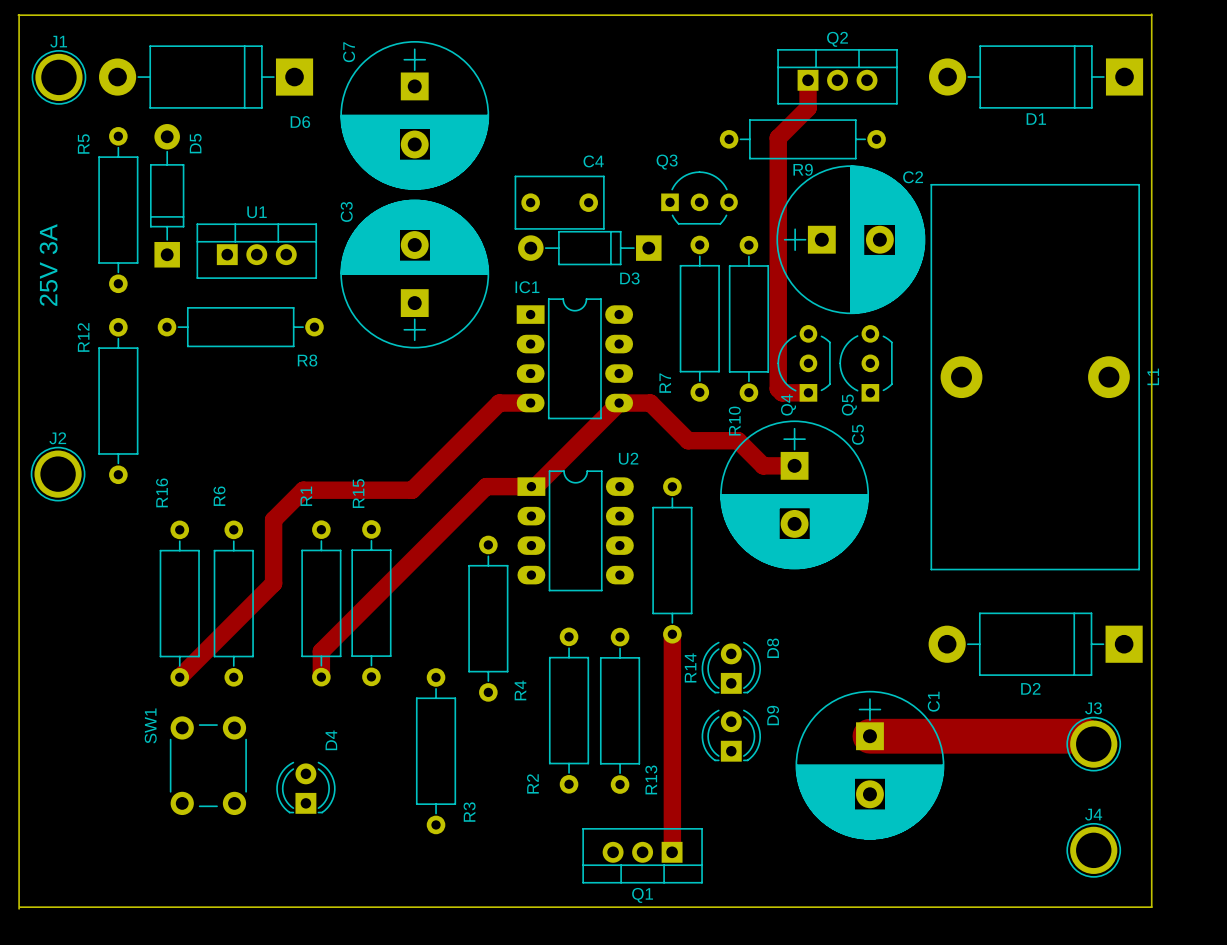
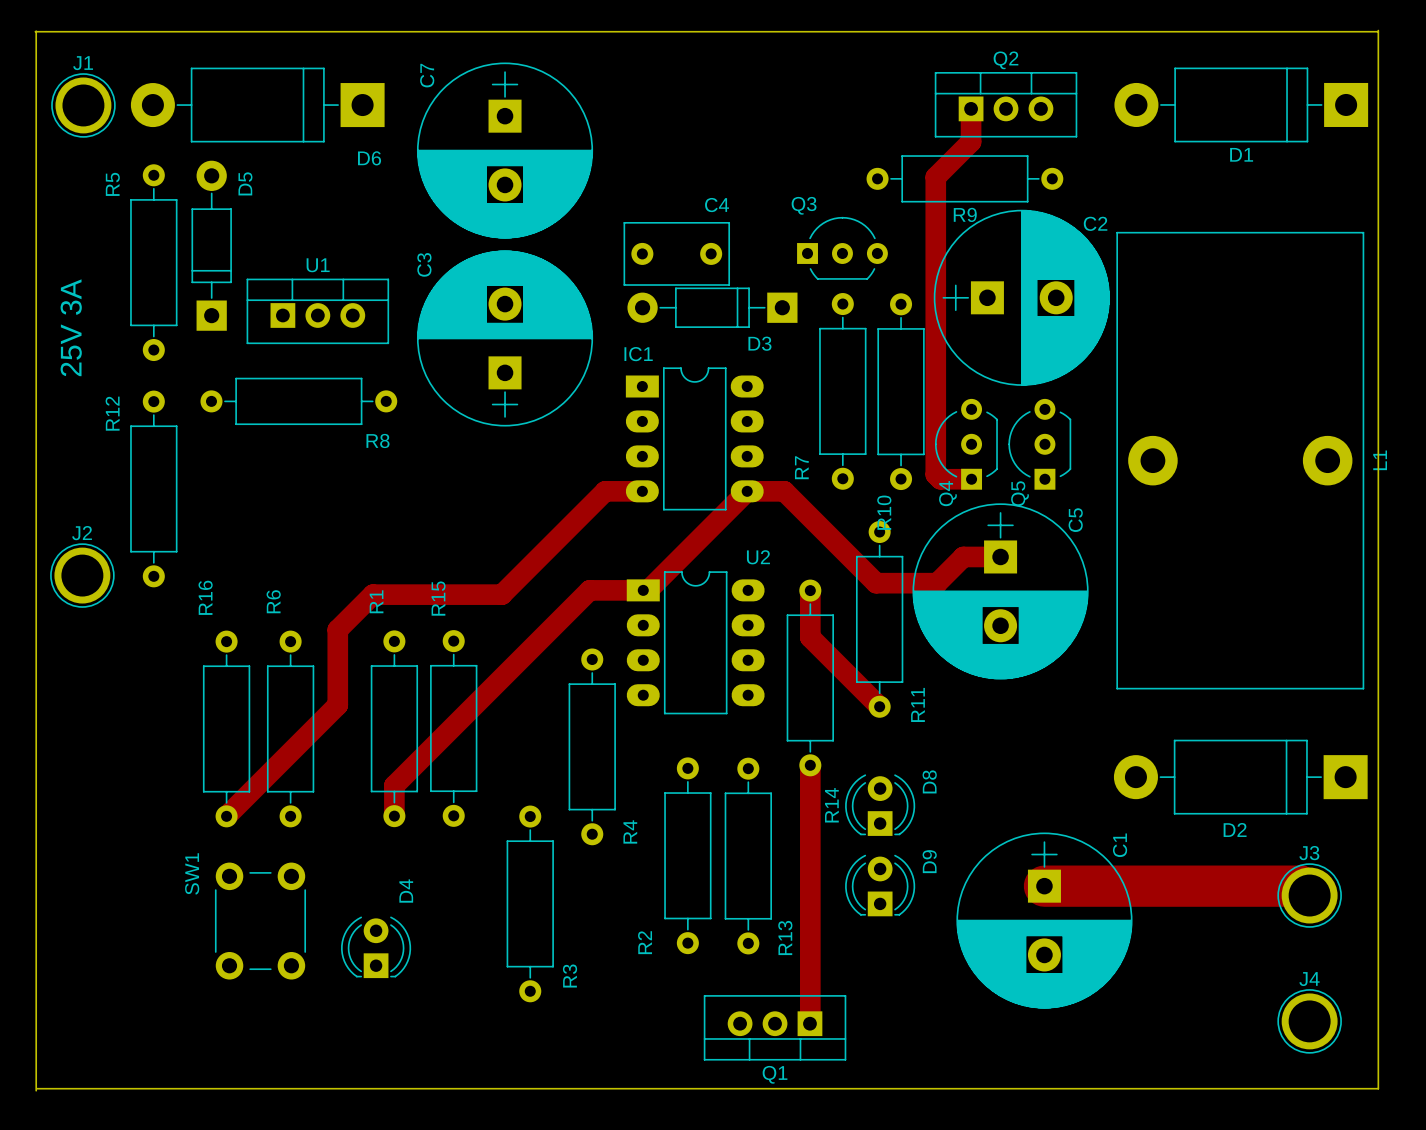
track: (688, 440) (738, 440) (763, 465) (794, 465) -> (829, 536) (876, 583) (937, 583) (963, 556) (1000, 556)
track: none -> (810, 590) (810, 637) (879, 706)
C5 position: (794, 494) -> (1000, 591)
R11: none -> (879, 619)

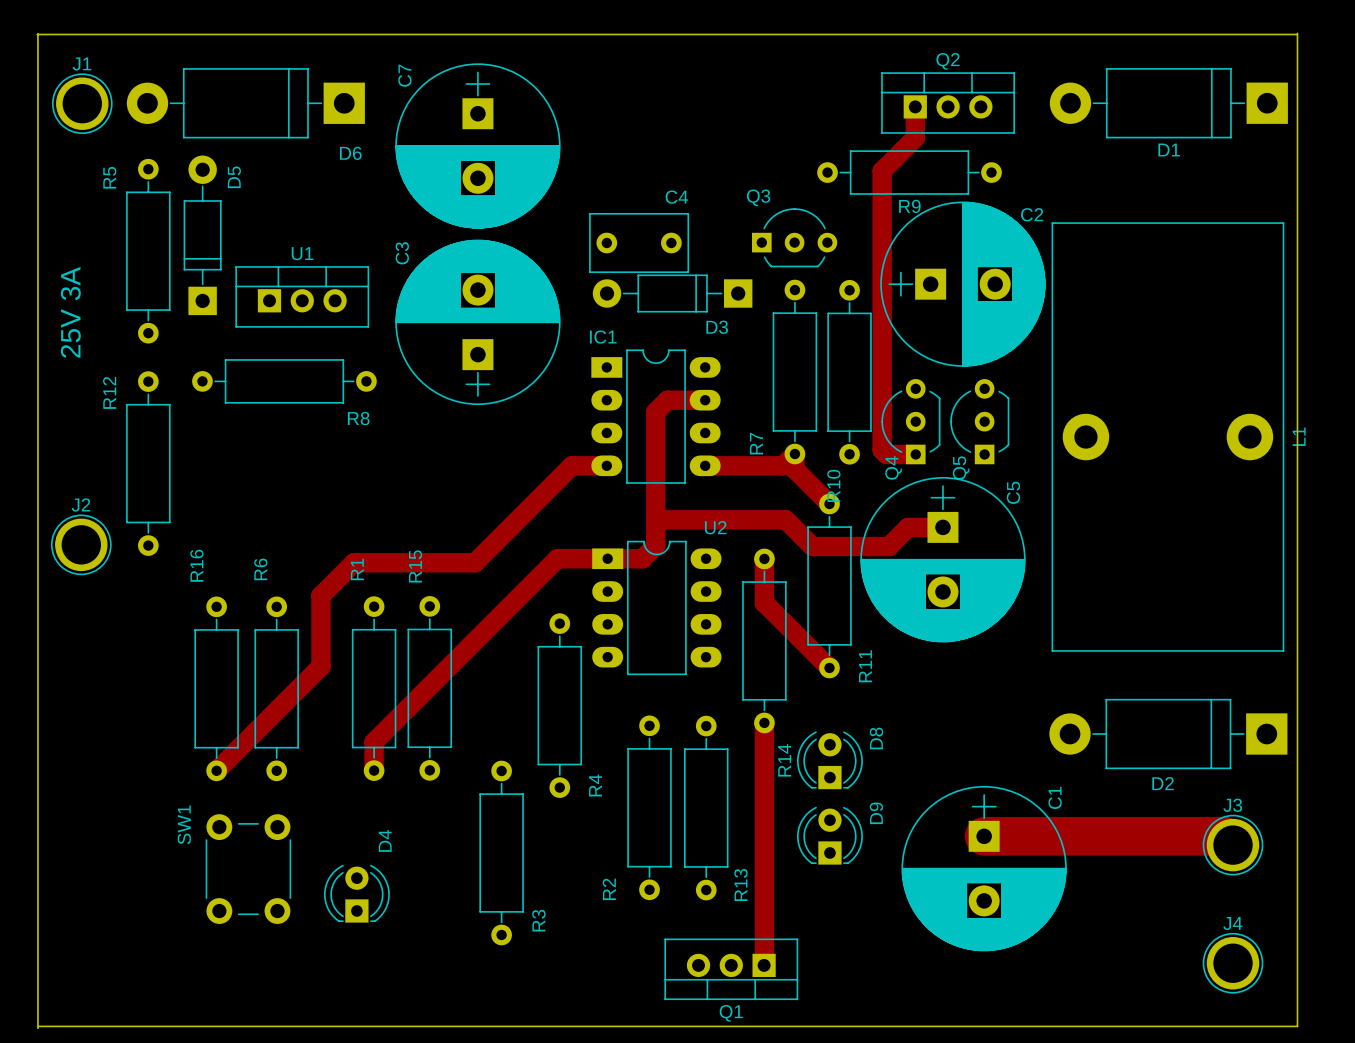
track: (747, 491) (648, 590) -> (705, 400) (667, 400) (655, 412) (655, 545) (642, 558) (612, 558)
track: (784, 491) (876, 583) (937, 583) (943, 577) -> (740, 465) (783, 465) (794, 454) (794, 469) (829, 503)
track: none -> (655, 519) (785, 519) (812, 546) (888, 546)

